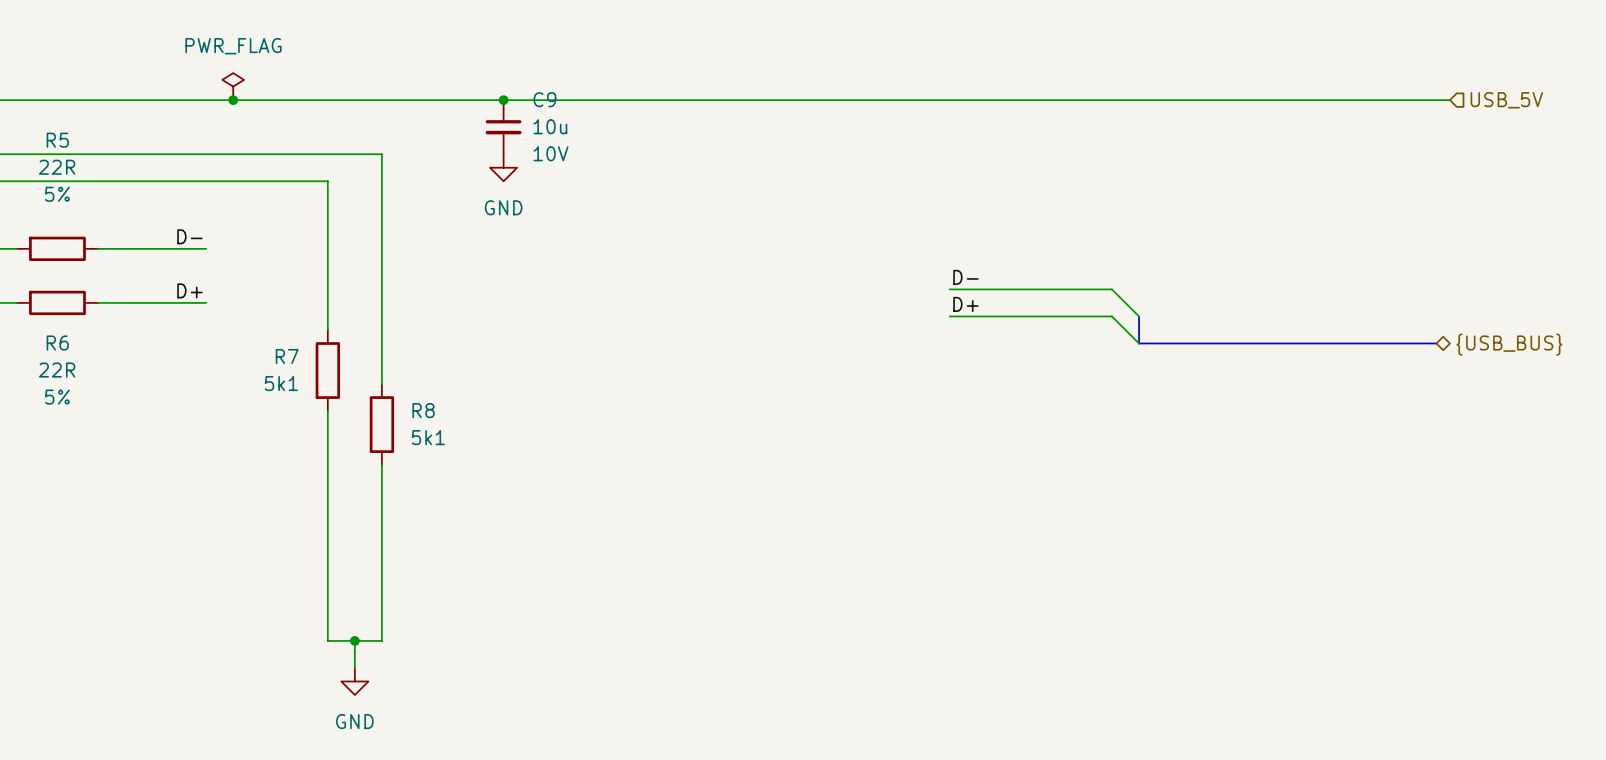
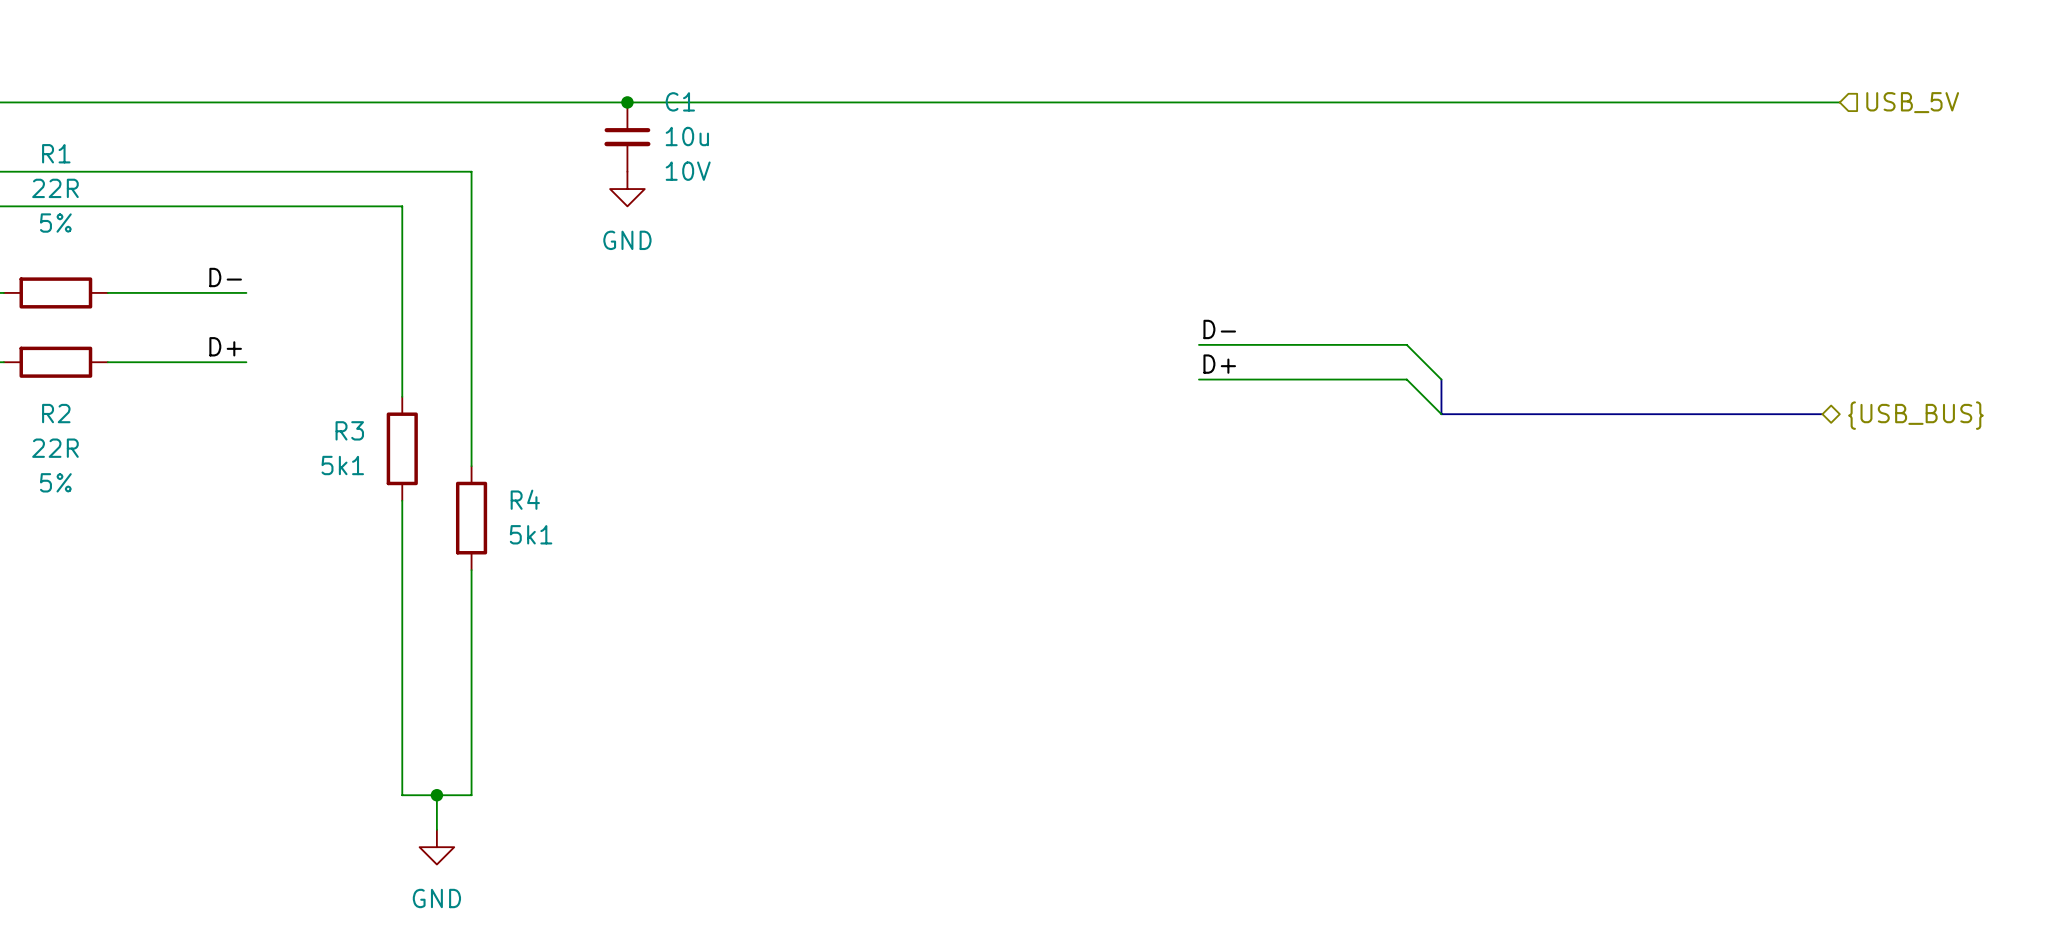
power symbol: PWR_FLAG (233, 86) -> none
C9 name: C9 (544, 99) -> C1 (680, 101)
junction: (233, 100) -> none
R5 name: R5 (57, 140) -> R1 (56, 153)
R6 name: R6 (57, 342) -> R2 (56, 413)
R7 name: R7 (287, 356) -> R3 (349, 430)
R8 name: R8 (423, 410) -> R4 (525, 499)

